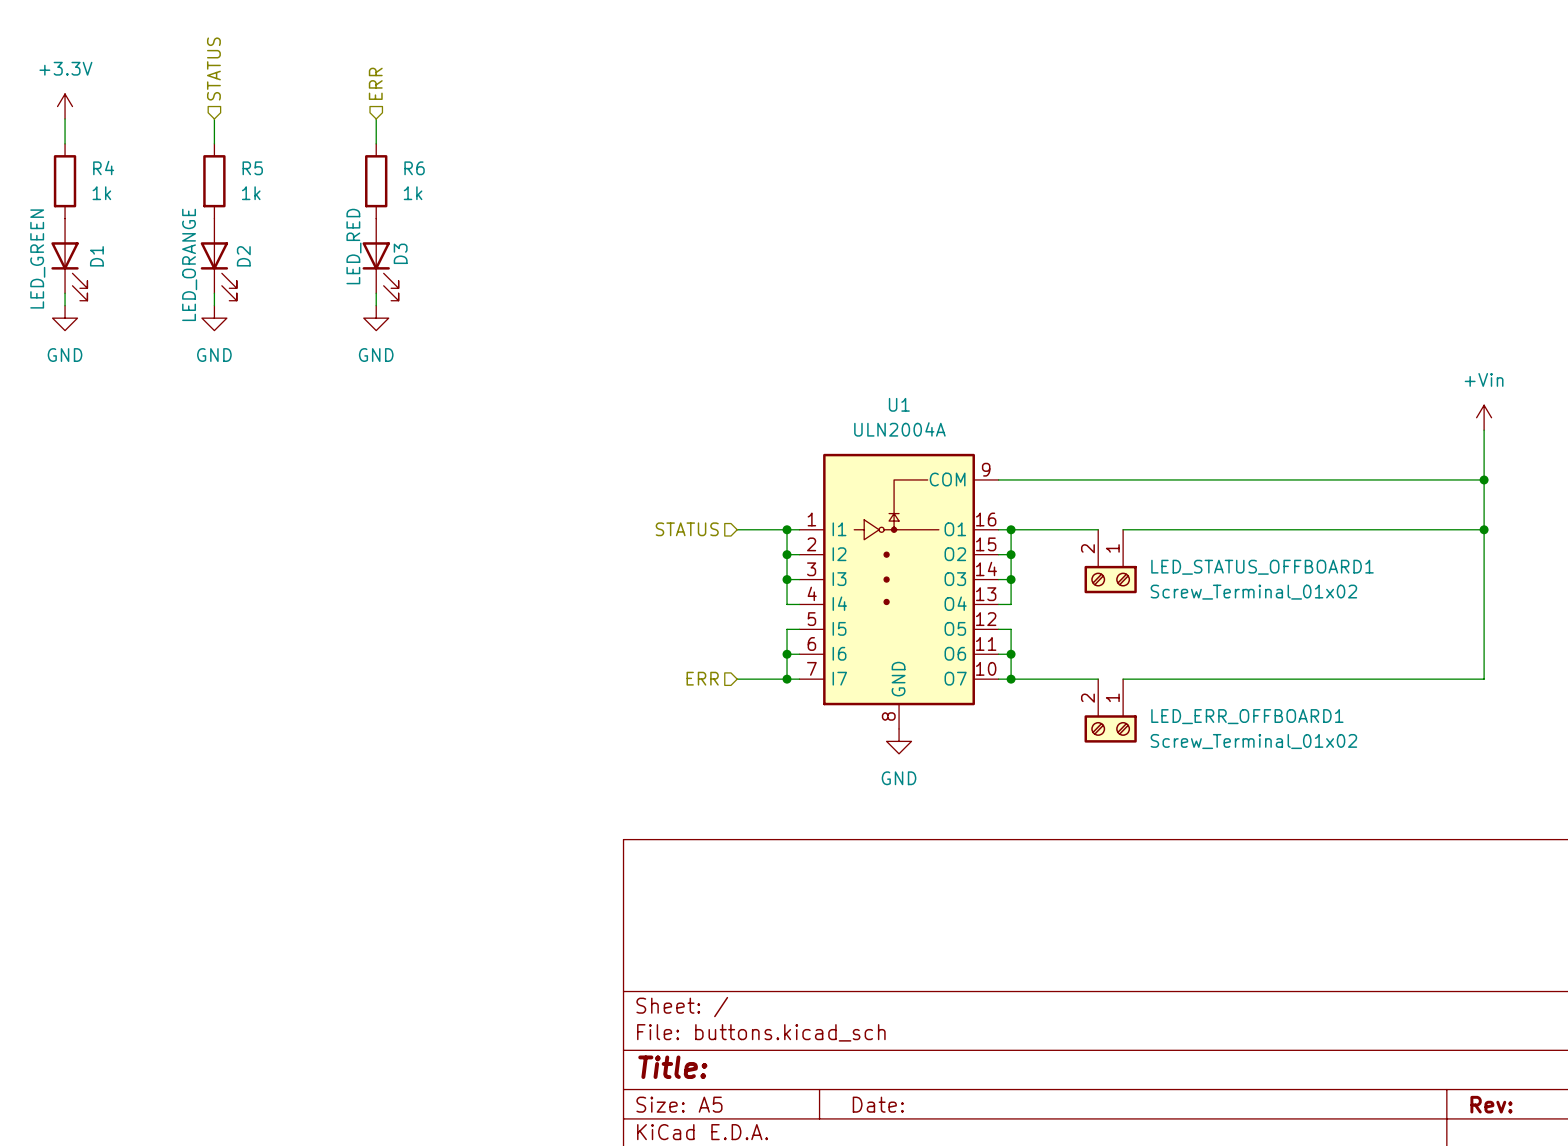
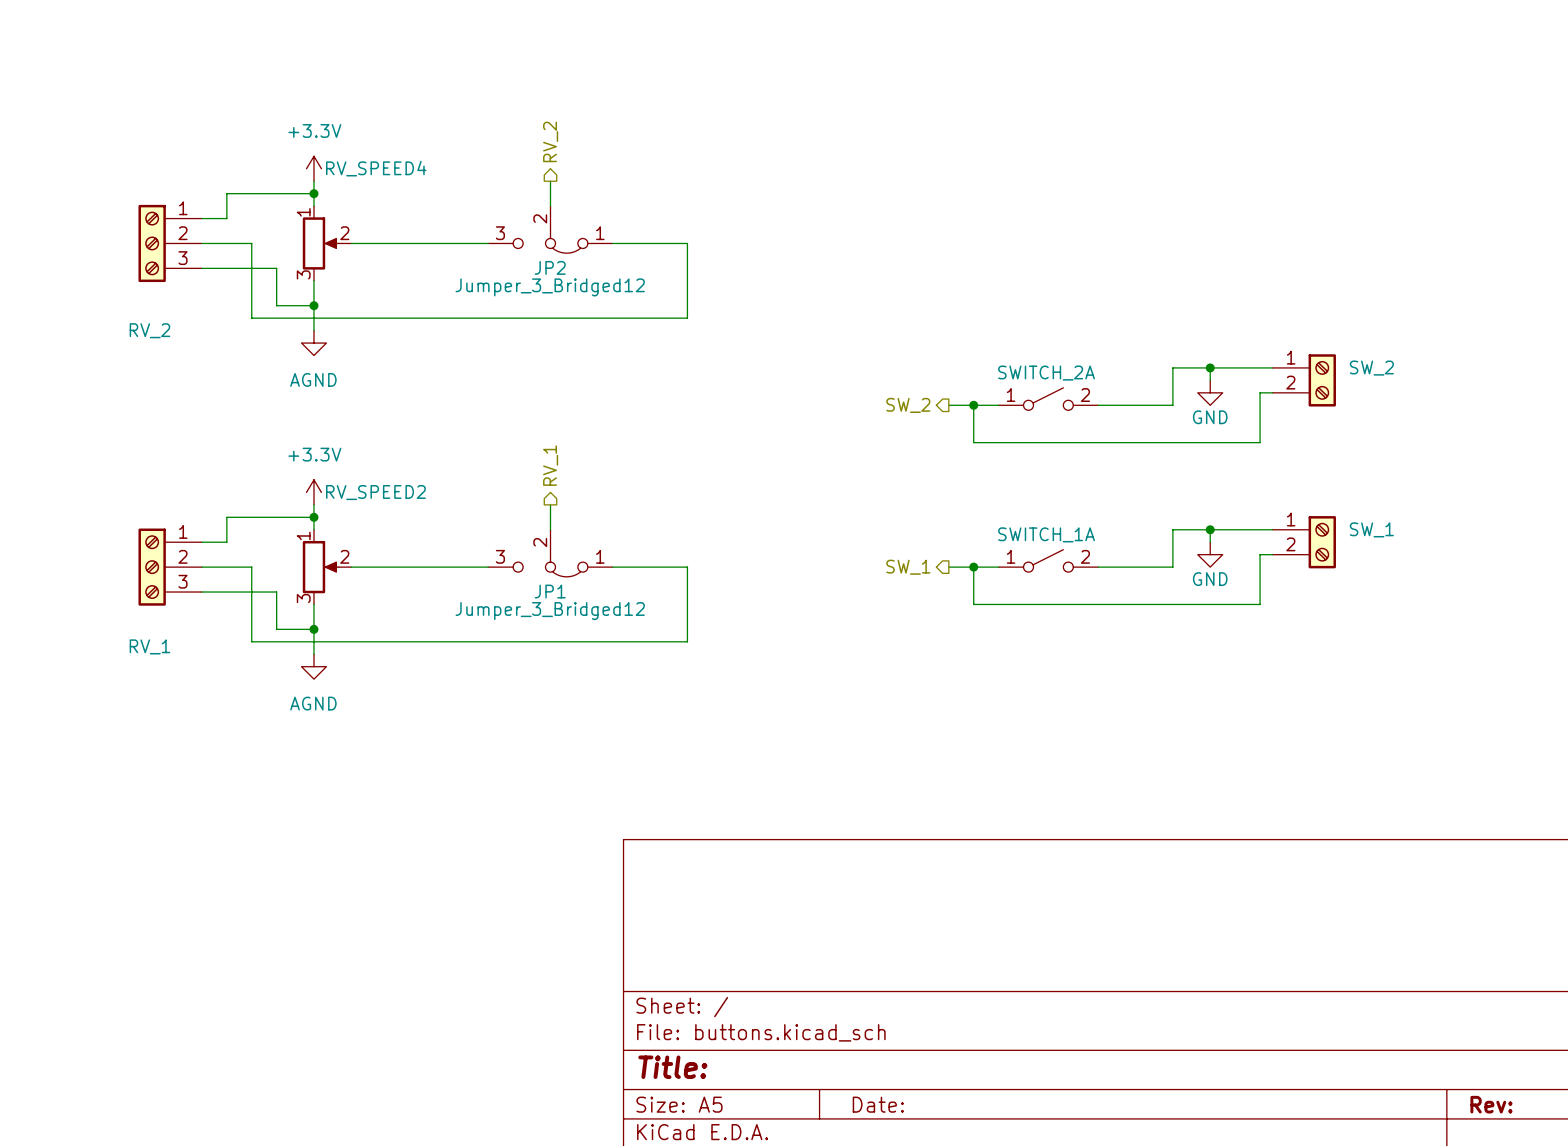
hierarchical label: STATUS (213, 69) -> none
hierarchical label: ERR (375, 83) -> none
power symbol: +3.3V (65, 106) -> none
wire: (65, 118) (65, 143) -> none
wire: (214, 118) (214, 143) -> none
wire: (376, 118) (376, 143) -> (313, 181) (313, 206)
hierarchical label: none -> RV_2 (550, 141)
power symbol: none -> +3.3V (313, 168)
R4: 1k (65, 181) -> none
R5: 1k (214, 181) -> none
R6: 1k (376, 181) -> none
wire: none -> (550, 181) (550, 206)
wire: none -> (313, 193) (226, 193) (226, 218) (201, 218)
junction: none -> (313, 193)
JP2: none -> Jumper_3_Bridged12 (550, 229)
RV_2: none -> (170, 243)
wire: none -> (201, 243) (251, 243) (251, 318) (687, 318) (687, 243) (612, 243)
RV_SPEED4: none -> (327, 243)
wire: none -> (351, 243) (488, 243)
D1: LED_GREEN (69, 259) -> none
D2: LED_ORANGE (218, 259) -> none
D3: LED_RED (380, 259) -> none
wire: none -> (201, 268) (276, 268) (276, 305) (313, 305)
wire: none -> (313, 280) (313, 330)
wire: (65, 293) (65, 305) -> none
wire: (214, 293) (214, 305) -> none
wire: (376, 293) (376, 305) -> none
junction: none -> (313, 305)
power symbol: GND (65, 318) -> none
power symbol: GND (214, 318) -> none
power symbol: GND (376, 318) -> none
power symbol: none -> AGND (313, 343)
wire: none -> (1210, 367) (1210, 380)
junction: none -> (1210, 367)
wire: none -> (1272, 367) (1172, 367) (1172, 405) (1098, 405)
SW_2: none -> (1304, 380)
power symbol: none -> GND (1210, 392)
wire: none -> (1272, 392) (1260, 392) (1260, 442) (973, 442) (973, 405)
SWITCH_2A: none -> (1048, 399)
hierarchical label: none -> SW_2 (908, 405)
wire: none -> (948, 405) (998, 405)
junction: none -> (973, 405)
power symbol: +Vin (1484, 417) -> none
wire: (1484, 430) (1484, 679) (1123, 679) -> none
hierarchical label: none -> RV_1 (550, 465)
wire: (998, 479) (1484, 479) -> none
junction: (1484, 479) -> none
power symbol: none -> +3.3V (313, 492)
wire: none -> (313, 504) (313, 529)
wire: none -> (550, 504) (550, 529)
wire: none -> (313, 517) (226, 517) (226, 542) (201, 542)
junction: none -> (313, 517)
hierarchical label: STATUS (687, 529) -> none
wire: (737, 529) (799, 529) -> none
wire: (787, 529) (787, 604) (799, 604) -> none
junction: (787, 529) -> none
wire: (998, 529) (1098, 529) -> none
wire: (1011, 529) (1011, 604) -> (1272, 554) (1260, 554) (1260, 604) (1011, 604)
junction: (1011, 529) -> none
wire: (1123, 529) (1172, 529) -> (1098, 567) (1172, 567) (1172, 529)
wire: none -> (1210, 529) (1210, 542)
junction: none -> (1210, 529)
wire: (1272, 529) (1484, 529) -> none
junction: (1484, 529) -> none
SW_1: none -> (1304, 542)
JP1: none -> Jumper_3_Bridged12 (550, 553)
wire: (787, 554) (799, 554) -> none
junction: (787, 554) -> none
wire: (998, 554) (1011, 554) -> none
junction: (1011, 554) -> none
power symbol: none -> GND (1210, 554)
SWITCH_1A: none -> (1048, 560)
LED_STATUS_OFFBOARD1: Screw_Terminal_01x02 (1110, 561) -> none
RV_1: none -> (170, 567)
wire: none -> (201, 567) (251, 567) (251, 641) (687, 641) (687, 567) (612, 567)
RV_SPEED2: none -> (327, 567)
wire: none -> (351, 567) (488, 567)
hierarchical label: none -> SW_1 (908, 567)
junction: none -> (973, 567)
wire: (787, 579) (799, 579) -> none
junction: (787, 579) -> none
wire: (998, 579) (1011, 579) -> none
junction: (1011, 579) -> none
U1: ULN2004A (899, 591) -> none
wire: none -> (201, 592) (276, 592) (276, 629) (313, 629)
wire: none -> (313, 604) (313, 654)
junction: none -> (313, 629)
wire: (799, 629) (787, 629) (787, 679) -> none
wire: (998, 629) (1011, 629) (1011, 679) -> none
wire: (787, 654) (799, 654) -> none
junction: (787, 654) -> none
wire: (998, 654) (1011, 654) -> none
junction: (1011, 654) -> none
power symbol: none -> AGND (313, 666)
hierarchical label: ERR (702, 678) -> none
wire: (737, 679) (799, 679) -> none
junction: (787, 679) -> none
wire: (998, 679) (1098, 679) -> none
junction: (1011, 679) -> none
LED_ERR_OFFBOARD1: Screw_Terminal_01x02 (1110, 710) -> none
power symbol: GND (899, 741) -> none

